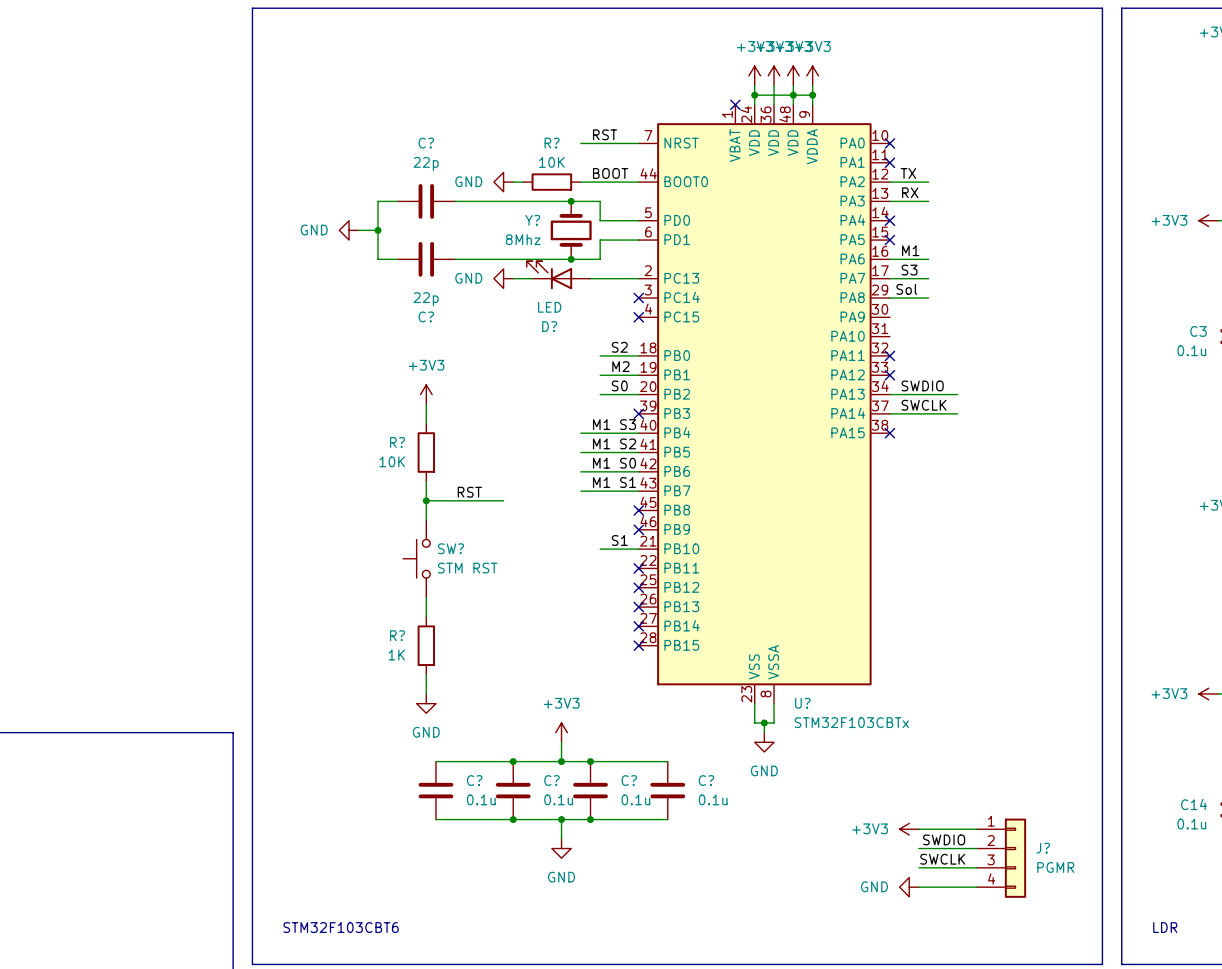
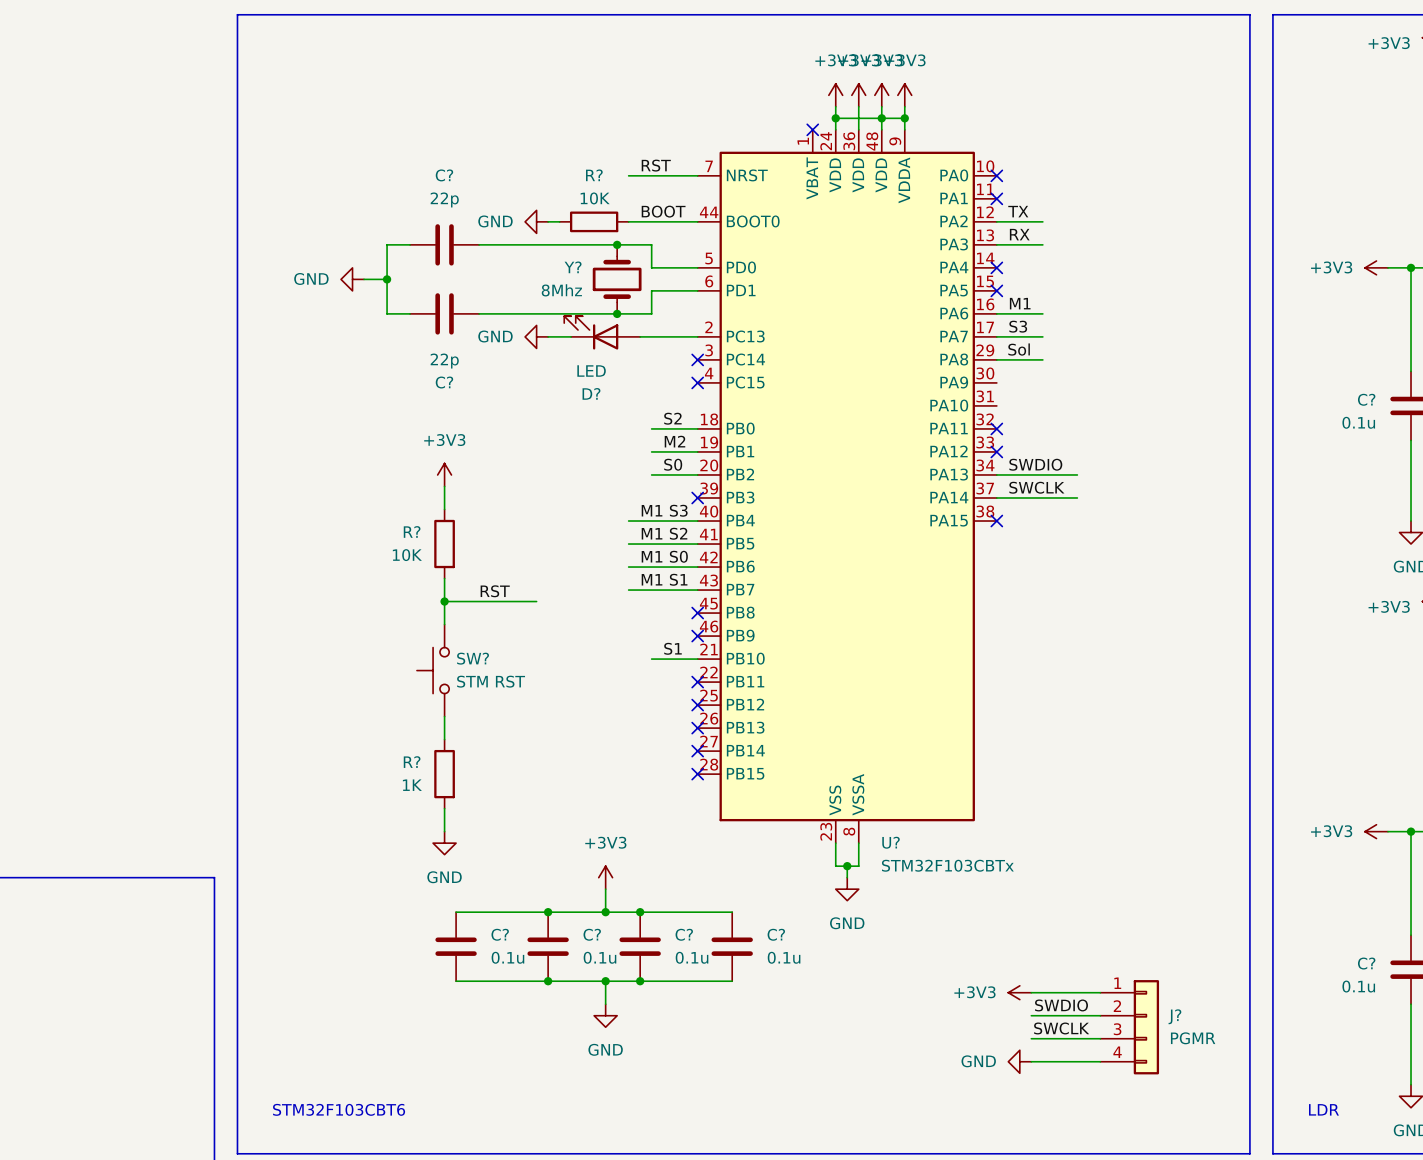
C3 name: C3 (1198, 331) -> C? (1366, 399)
C14 name: C14 (1194, 804) -> C? (1366, 963)

